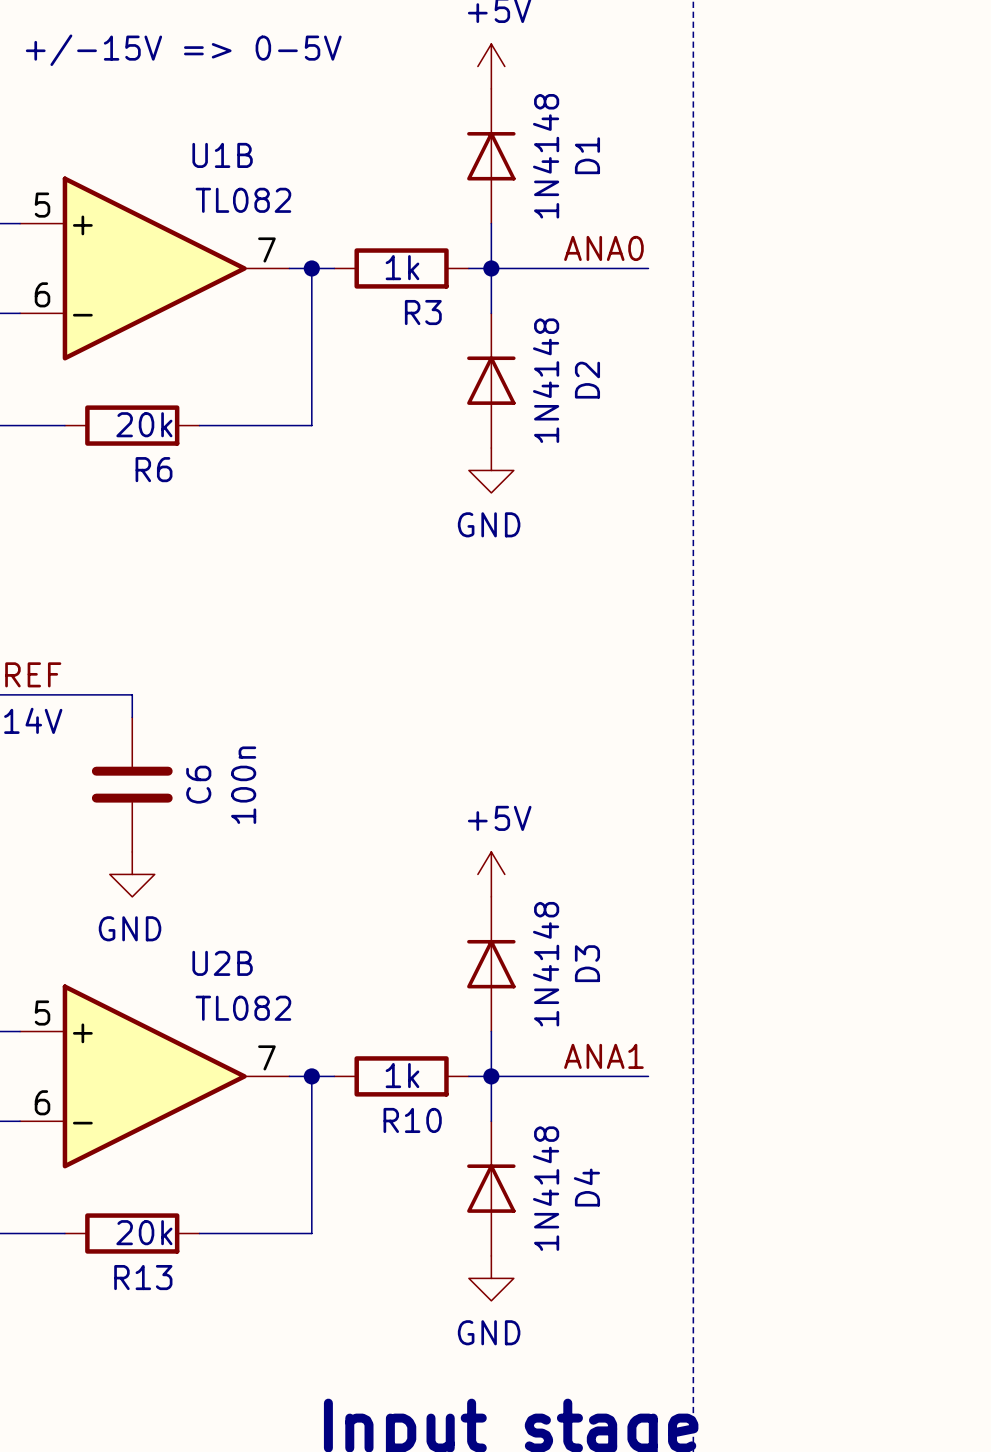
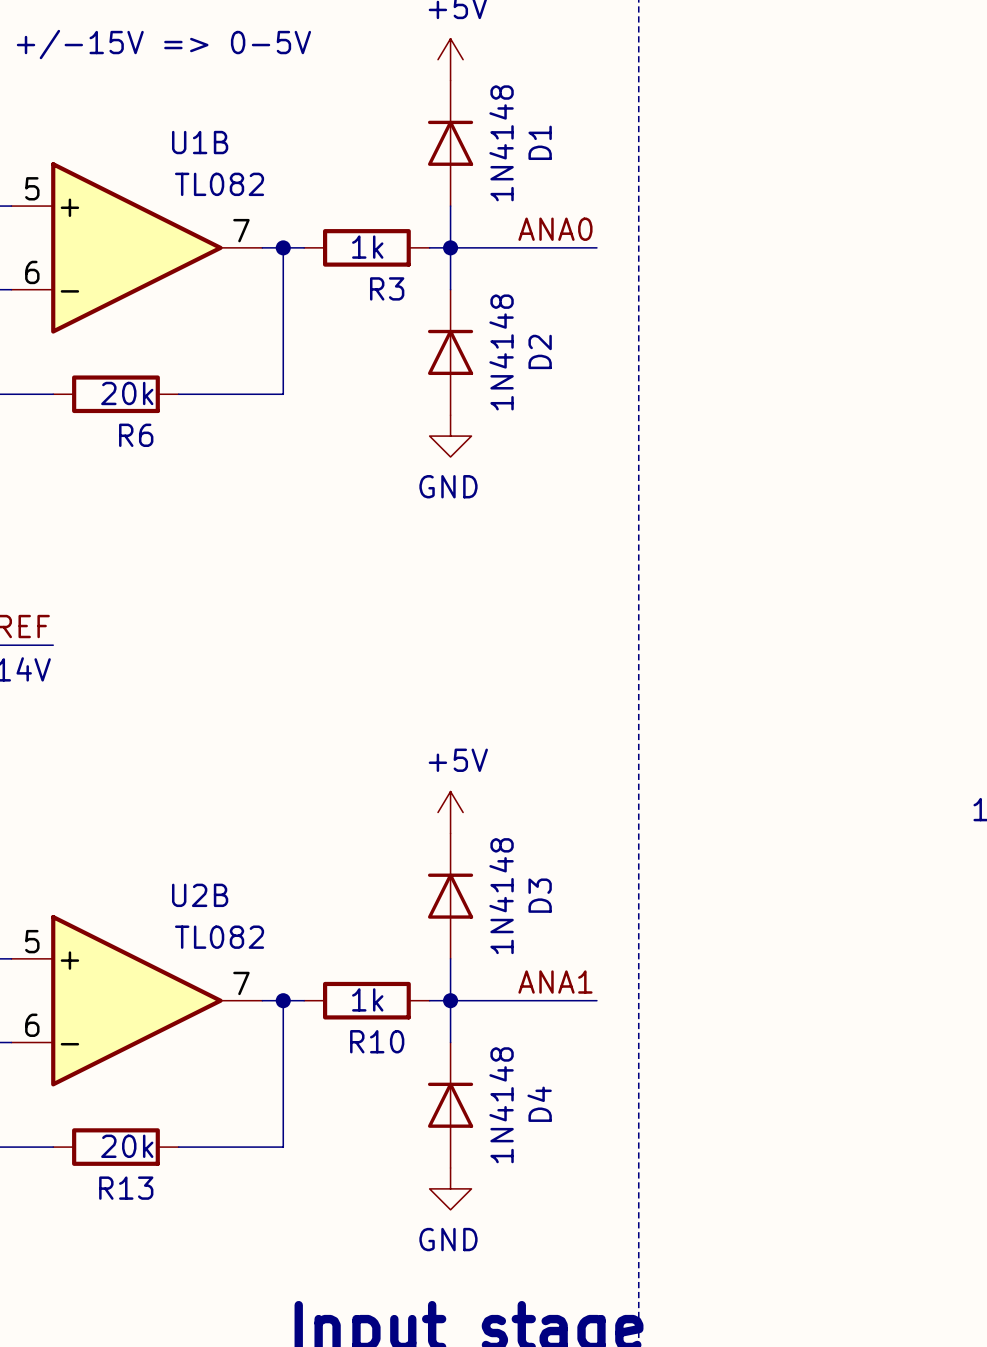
wire: (64, 694) (132, 694) (132, 717) -> none
C6: 100n (132, 784) -> none
power symbol: GND (132, 874) -> none

